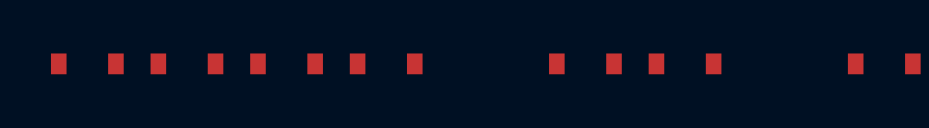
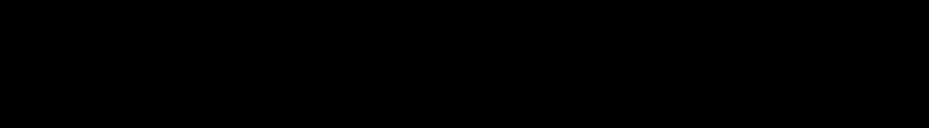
part: (87, 63) -> none
part: (186, 63) -> none
part: (286, 63) -> none
part: (386, 63) -> none
part: (585, 63) -> none
part: (685, 63) -> none
part: (884, 63) -> none

